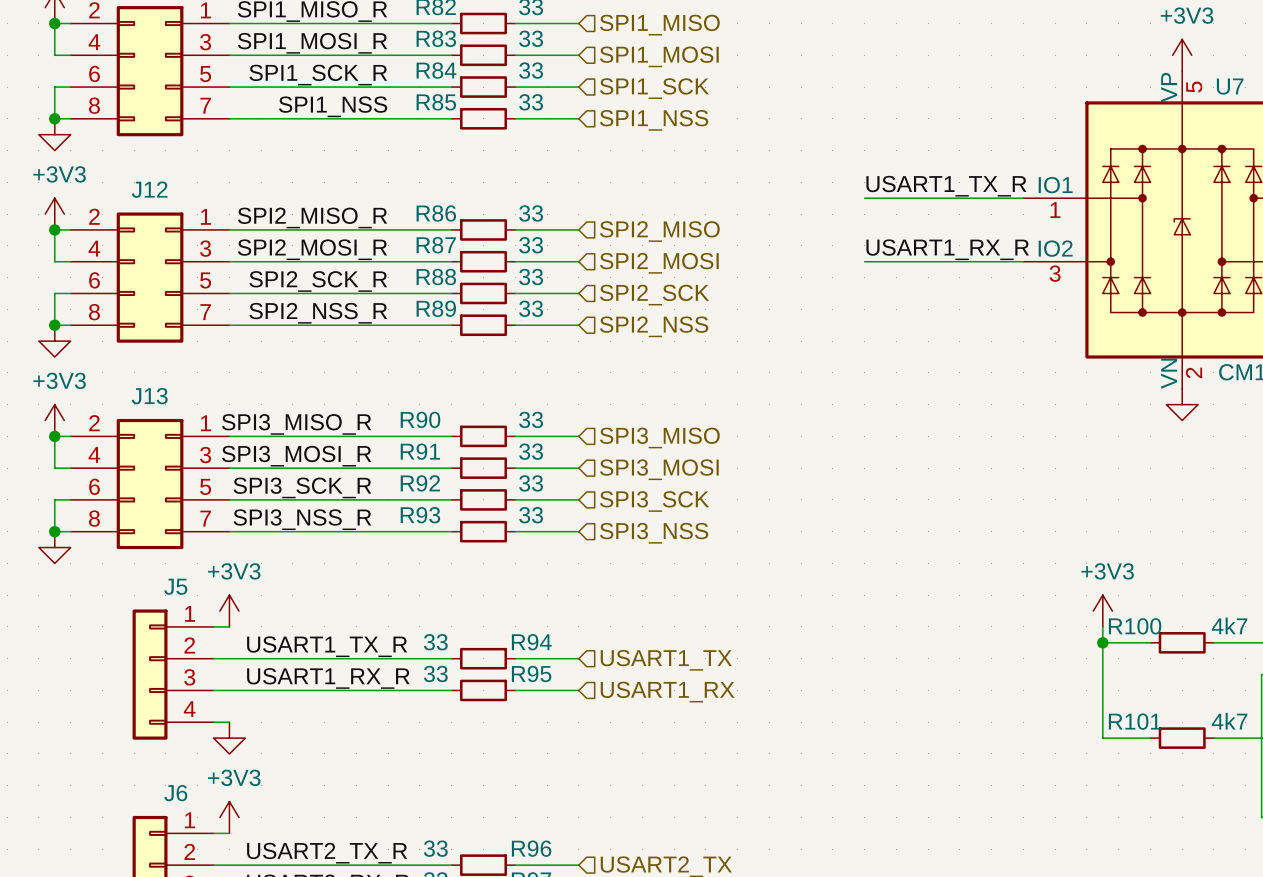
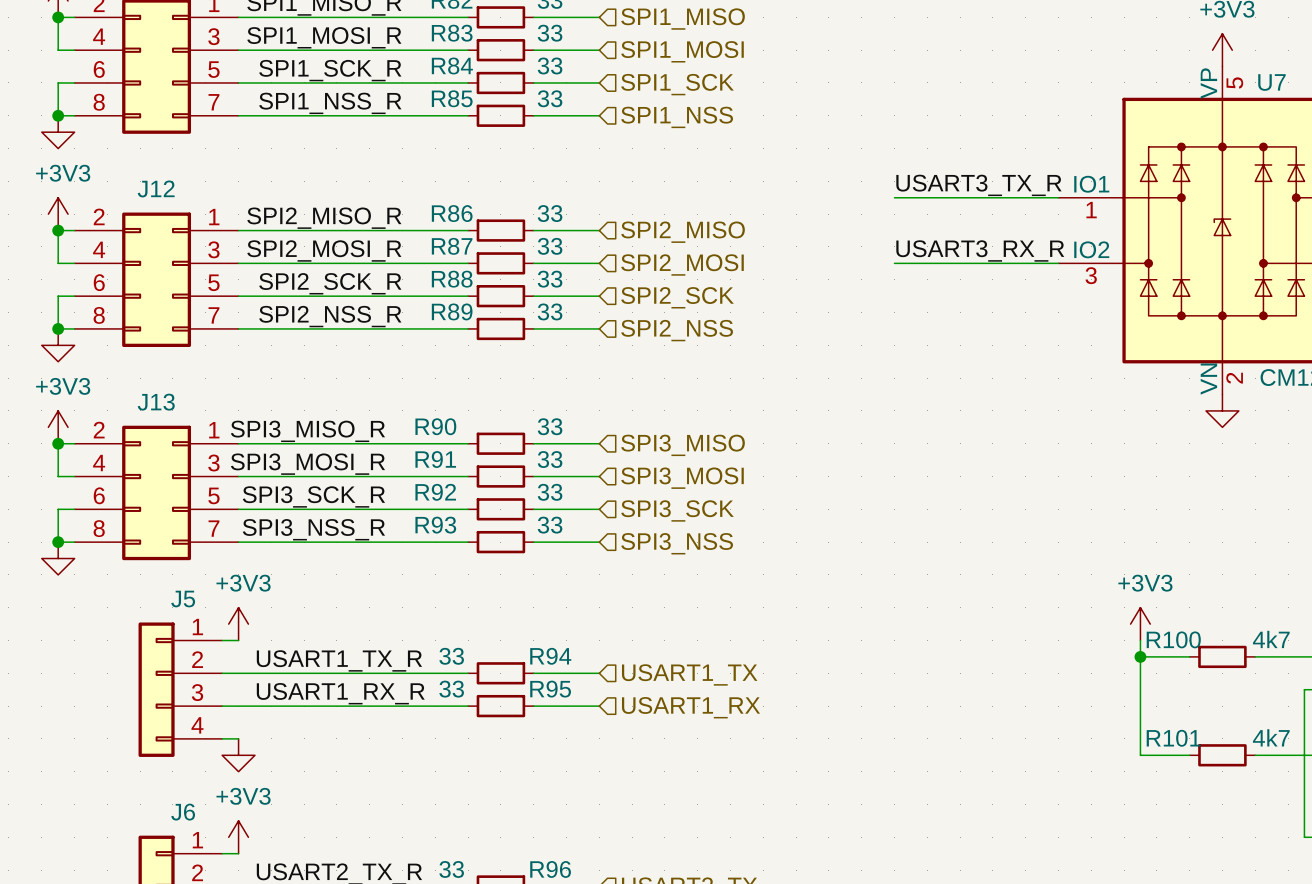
label: SPI1_NSS (333, 106) -> SPI1_NSS_R (330, 103)
label: USART1_TX_R (946, 186) -> USART3_TX_R (978, 185)
label: USART1_RX_R (947, 249) -> USART3_RX_R (980, 250)

